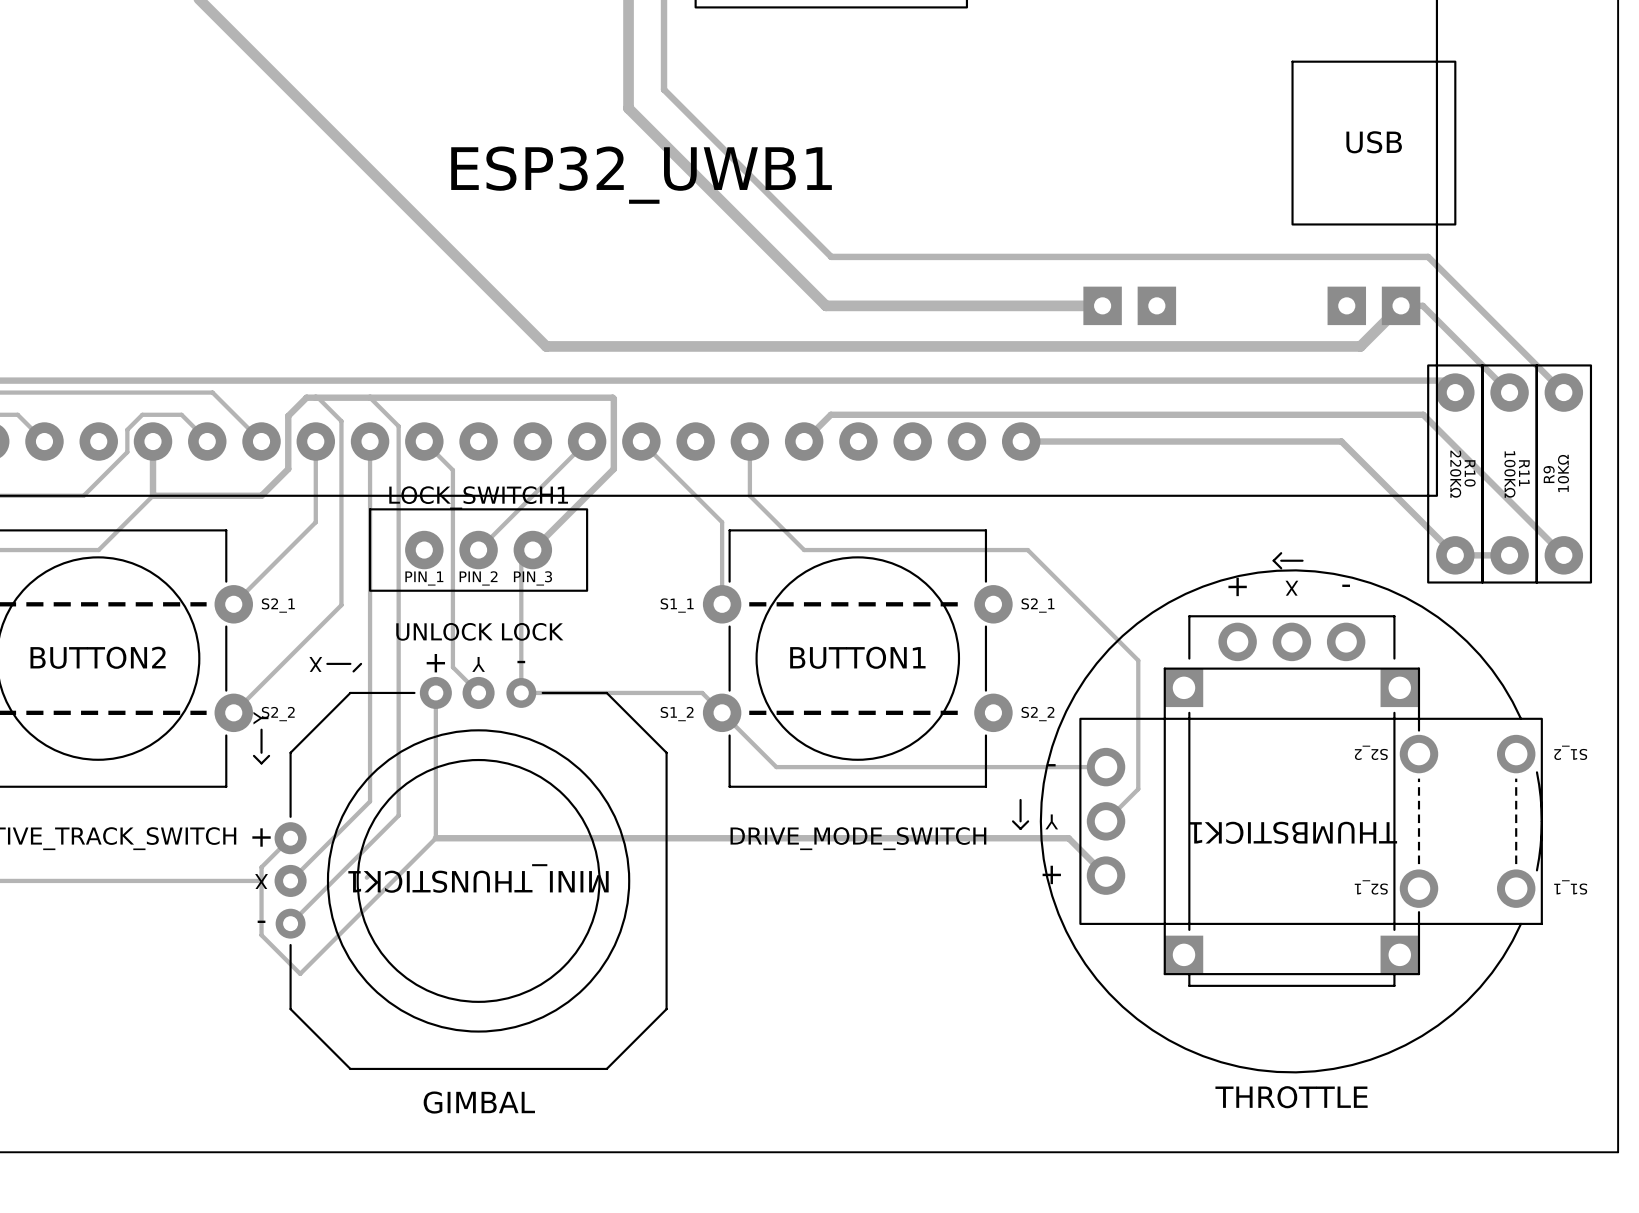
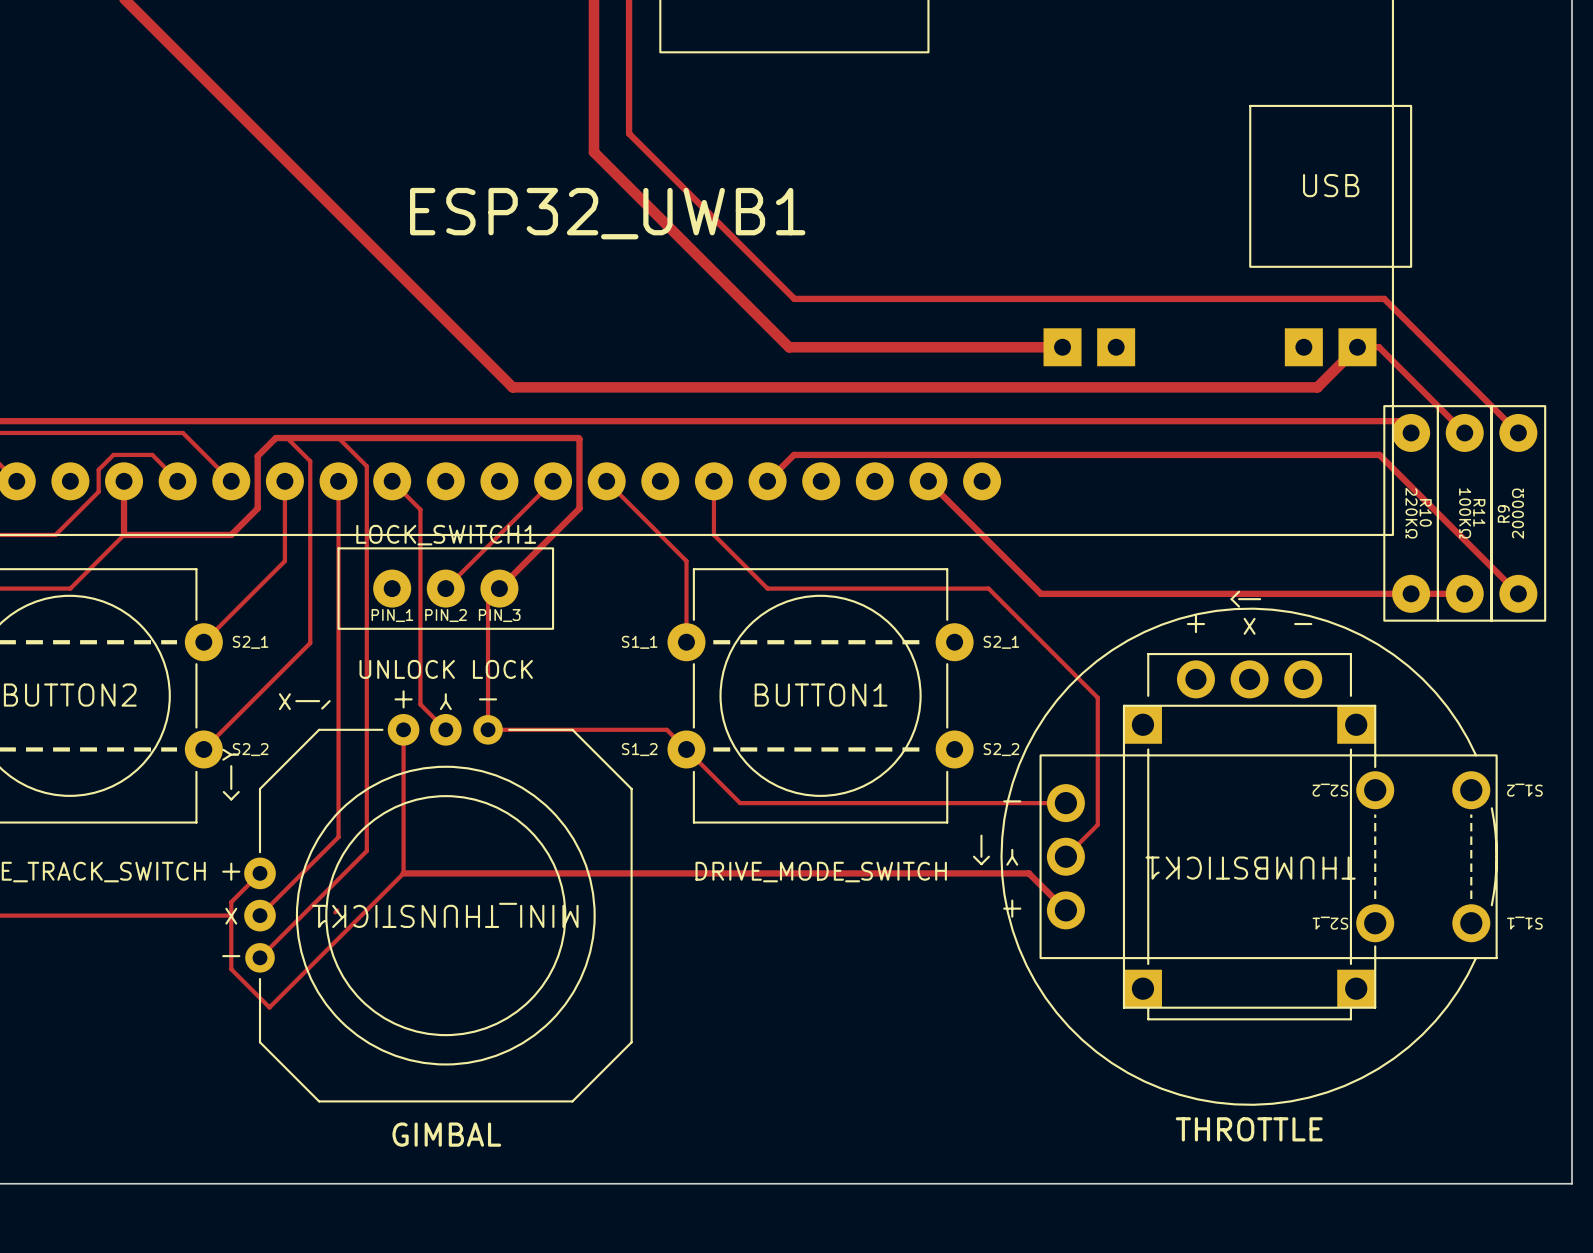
track: (1021, 441) (1341, 441) (1455, 555) -> (928, 481) (1040, 593) (1411, 593)
R9 value: 10KΩ (1563, 473) -> 2000Ω (1517, 513)

